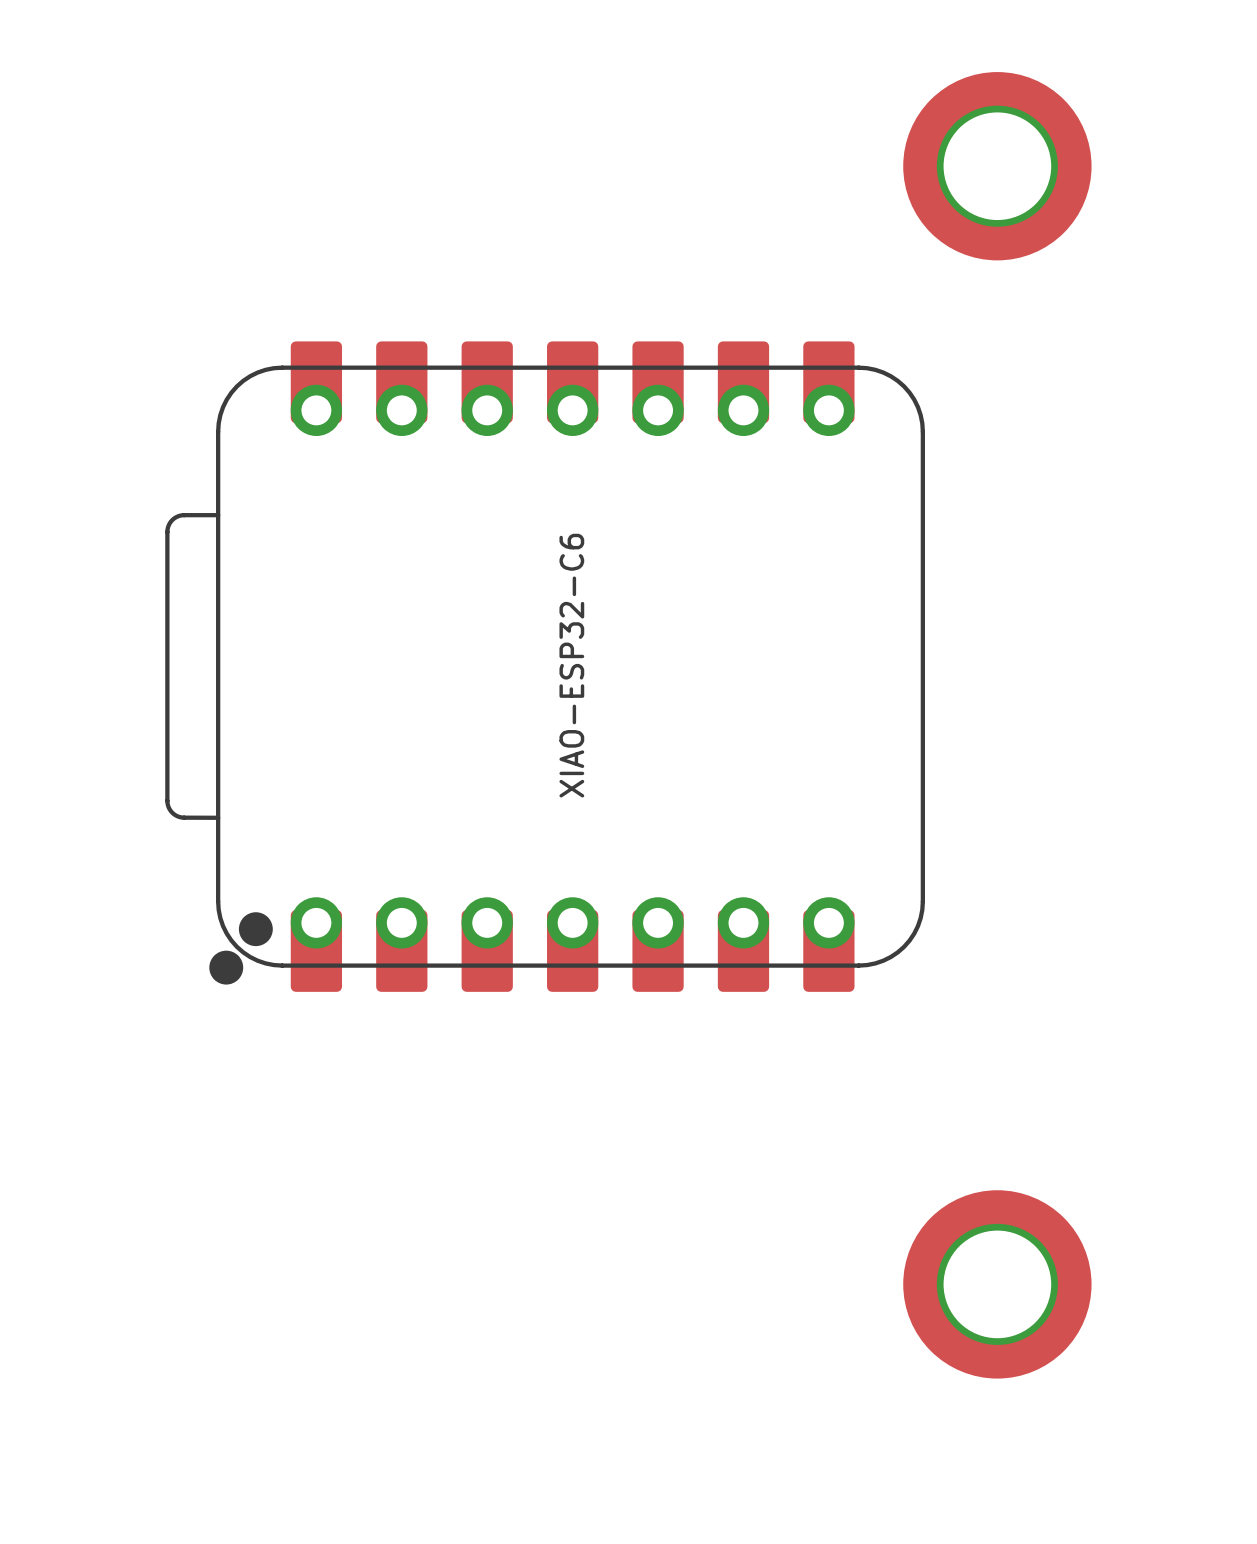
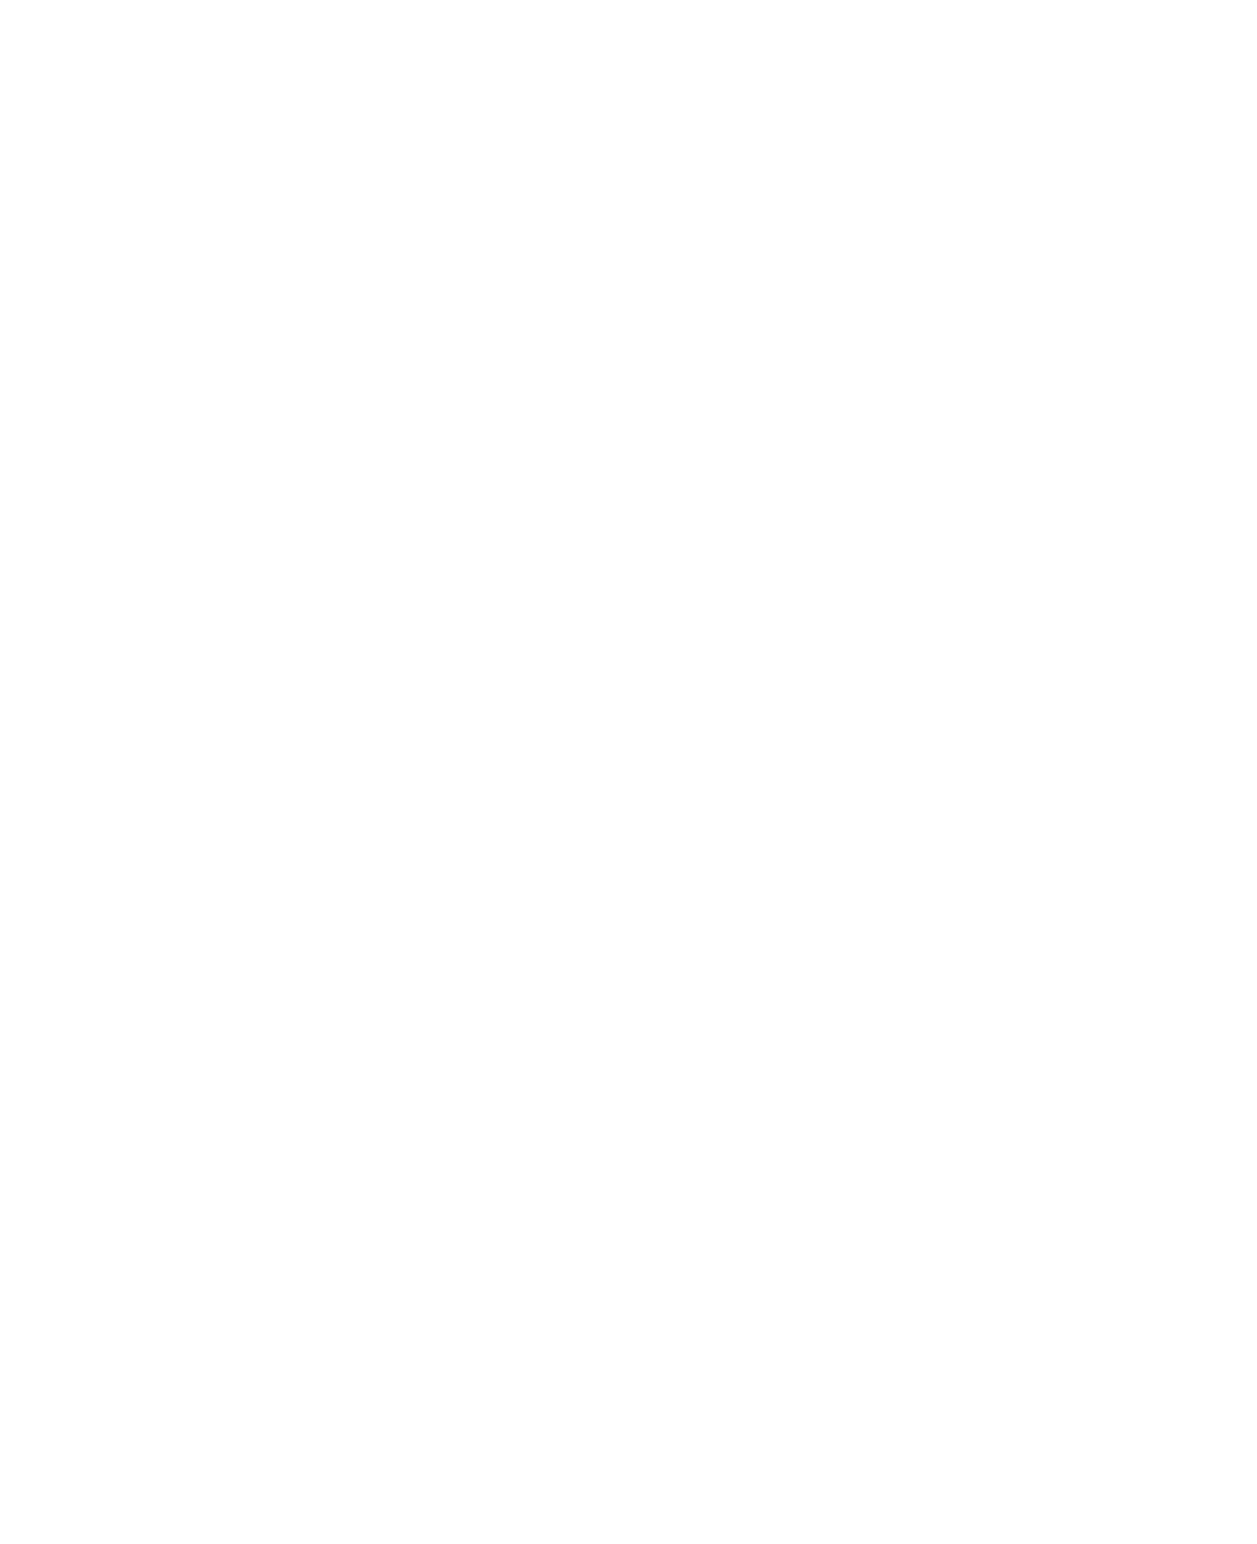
part: (997, 166) -> none
part: XIAO-ESP32-C6 (545, 666) -> none
part: (997, 1284) -> none

